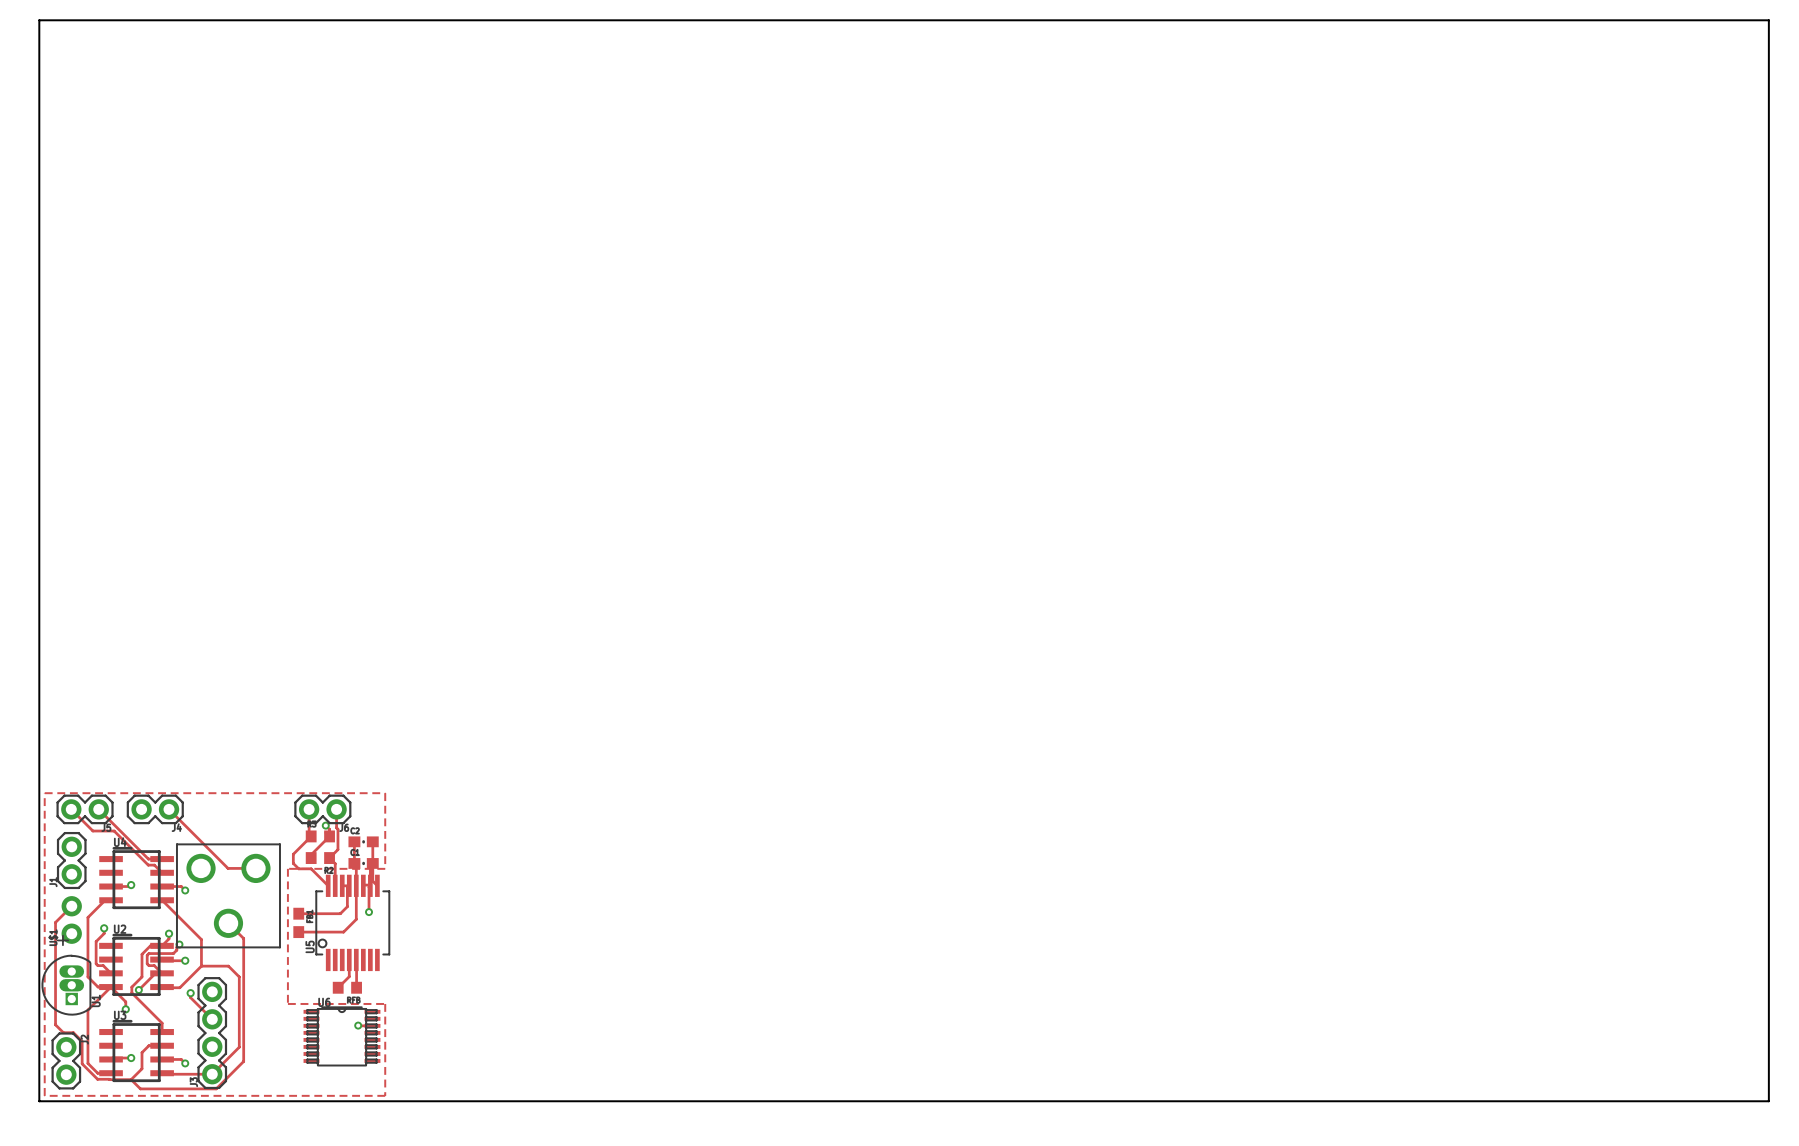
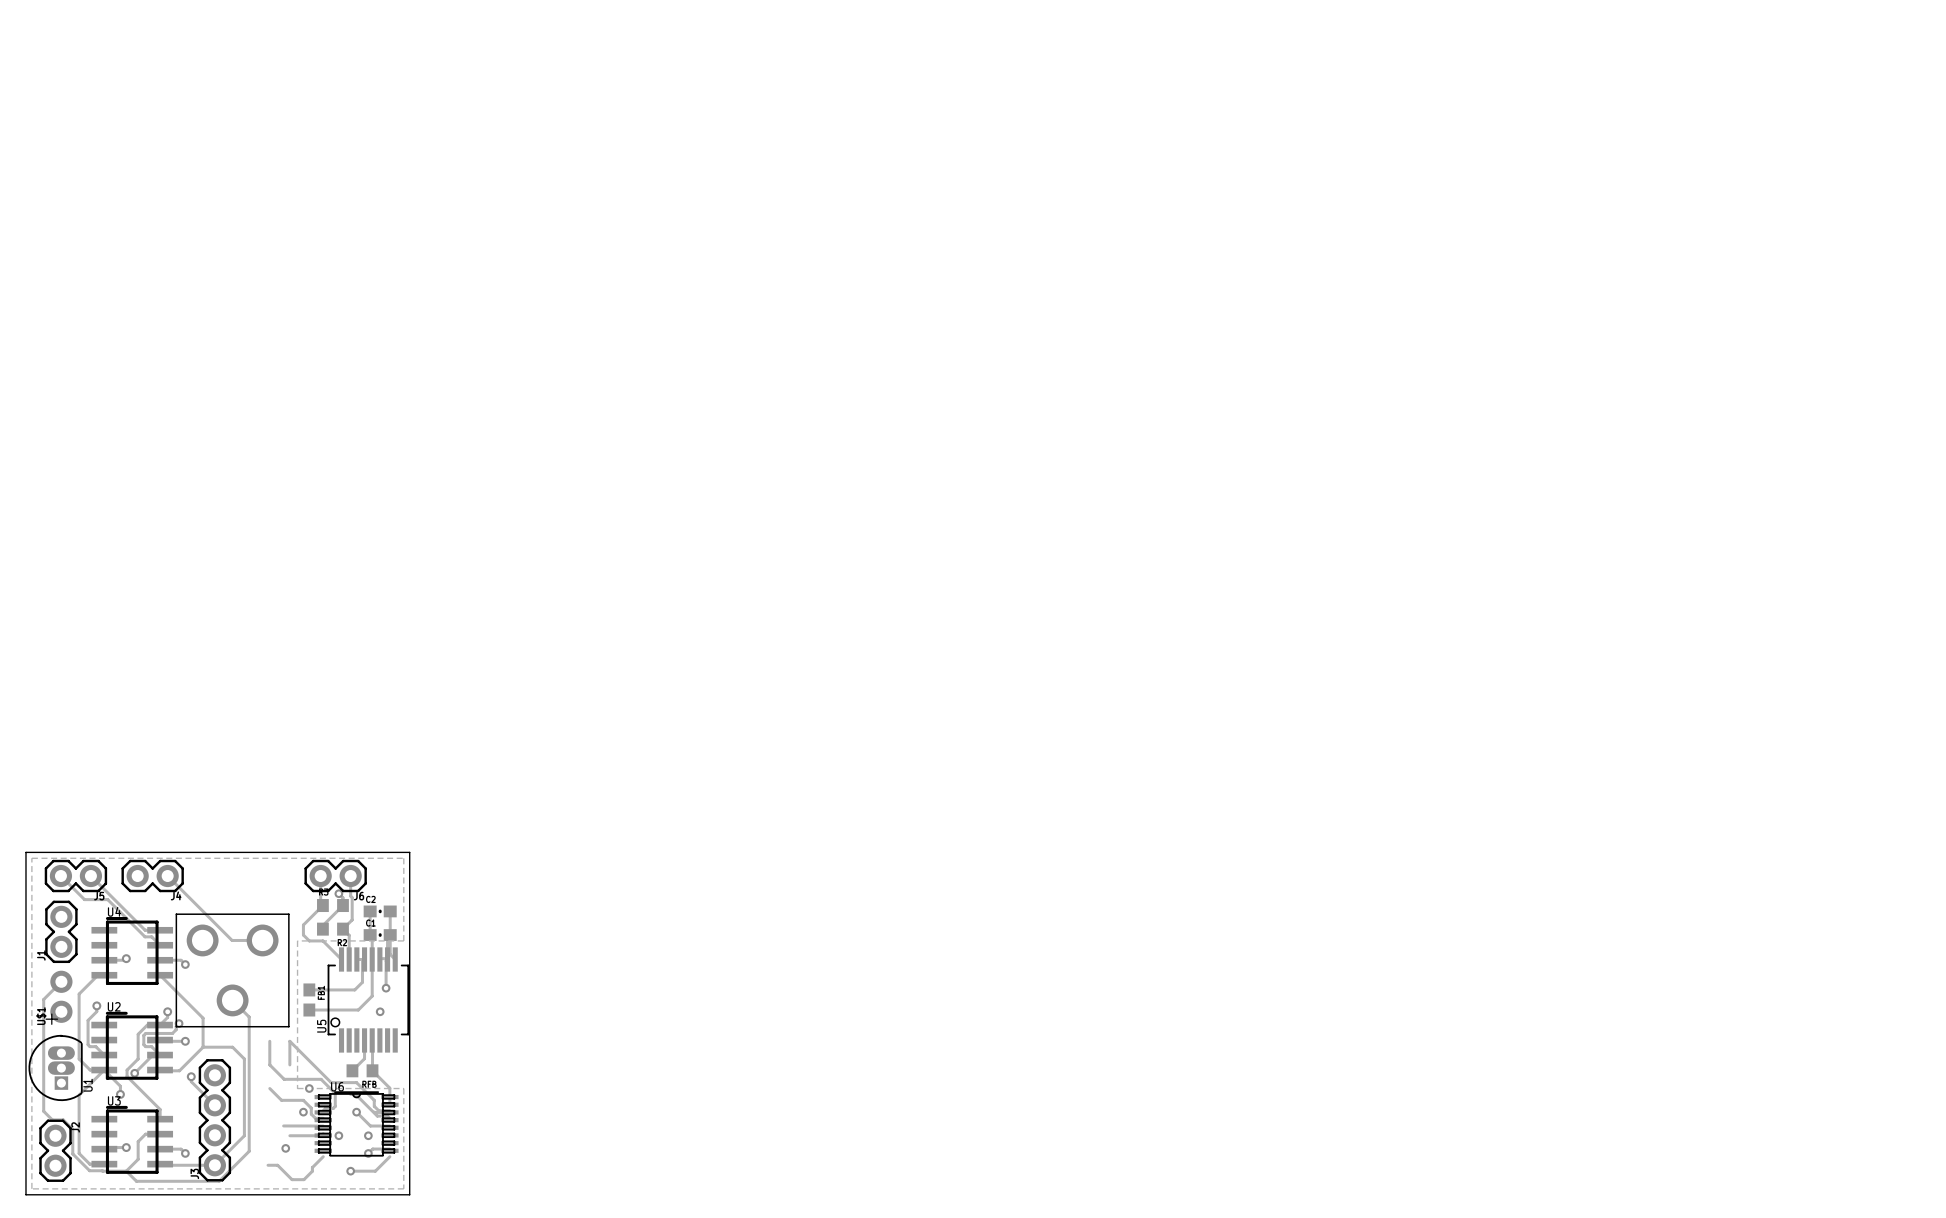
board edge: (39, 787) (39, 20) (1768, 20) (1768, 1101) (390, 1101) -> (25, 852) (409, 852) (409, 1194)
via: none -> (380, 1011)
track: none -> (269, 1041) (269, 1064) (284, 1079) (321, 1079) (335, 1093) (335, 1106) (323, 1110)
track: none -> (289, 1064) (289, 1041) (331, 1082) (356, 1082) (374, 1100) (374, 1106) (378, 1110) (389, 1110)
track: none -> (372, 1070) (389, 1088) (389, 1102)
track: none -> (269, 1088) (281, 1100) (303, 1100) (311, 1108) (311, 1114) (315, 1118) (323, 1118)
via: none -> (309, 1088)
track: none -> (350, 1094) (355, 1094) (377, 1116) (387, 1116) (389, 1118)
via: none -> (303, 1112)
track: none -> (356, 1112) (370, 1126) (389, 1126)
via: none -> (356, 1112)
via: (358, 1025) -> none
track: none -> (283, 1125) (323, 1126)
track: none -> (323, 1133) (321, 1135) (289, 1135)
via: none -> (338, 1135)
via: none -> (368, 1135)
via: none -> (285, 1148)
track: none -> (389, 1149) (372, 1149) (368, 1153)
via: none -> (368, 1153)
track: none -> (323, 1156) (303, 1179) (292, 1179) (277, 1165) (268, 1165)
track: none -> (389, 1156) (375, 1171) (350, 1171)
via: none -> (350, 1171)

